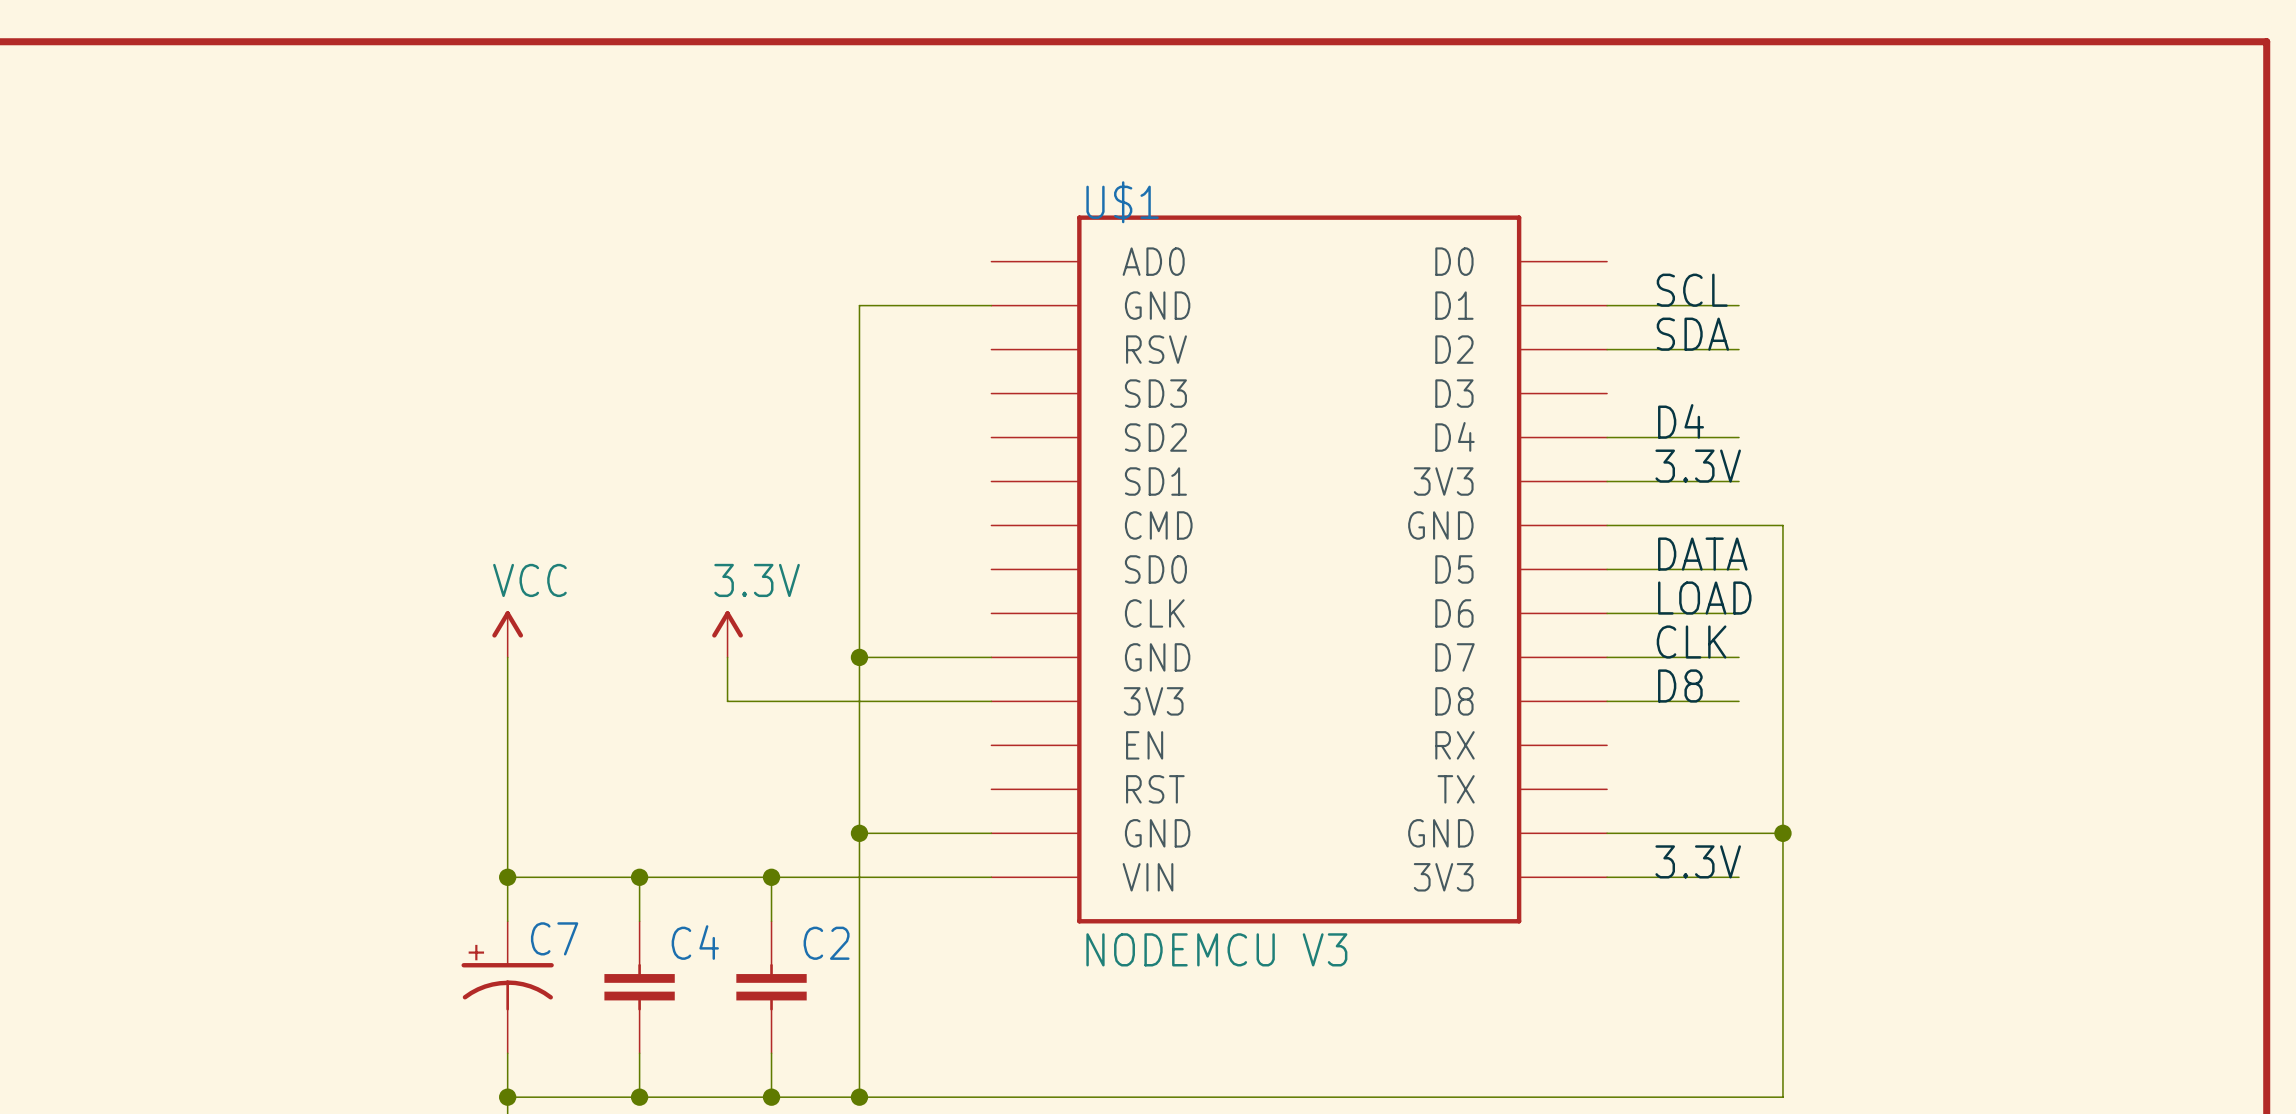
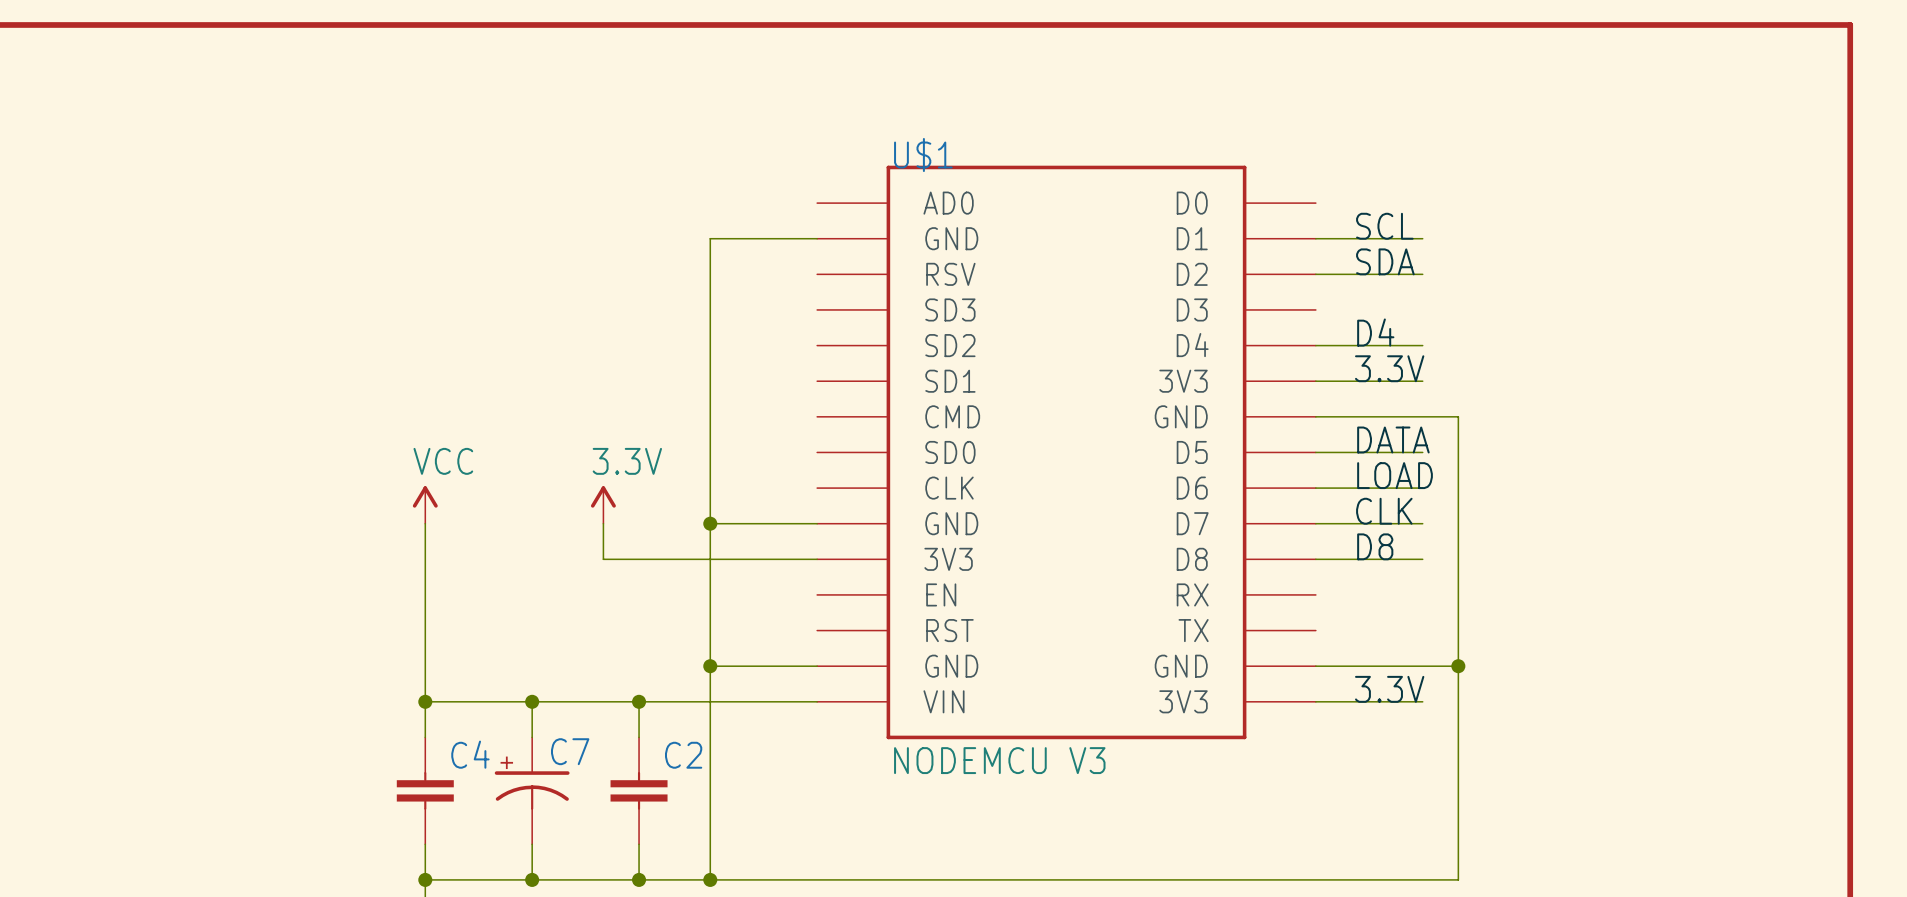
C7 position: (507, 987) -> (532, 790)
C4 position: (639, 987) -> (425, 790)

